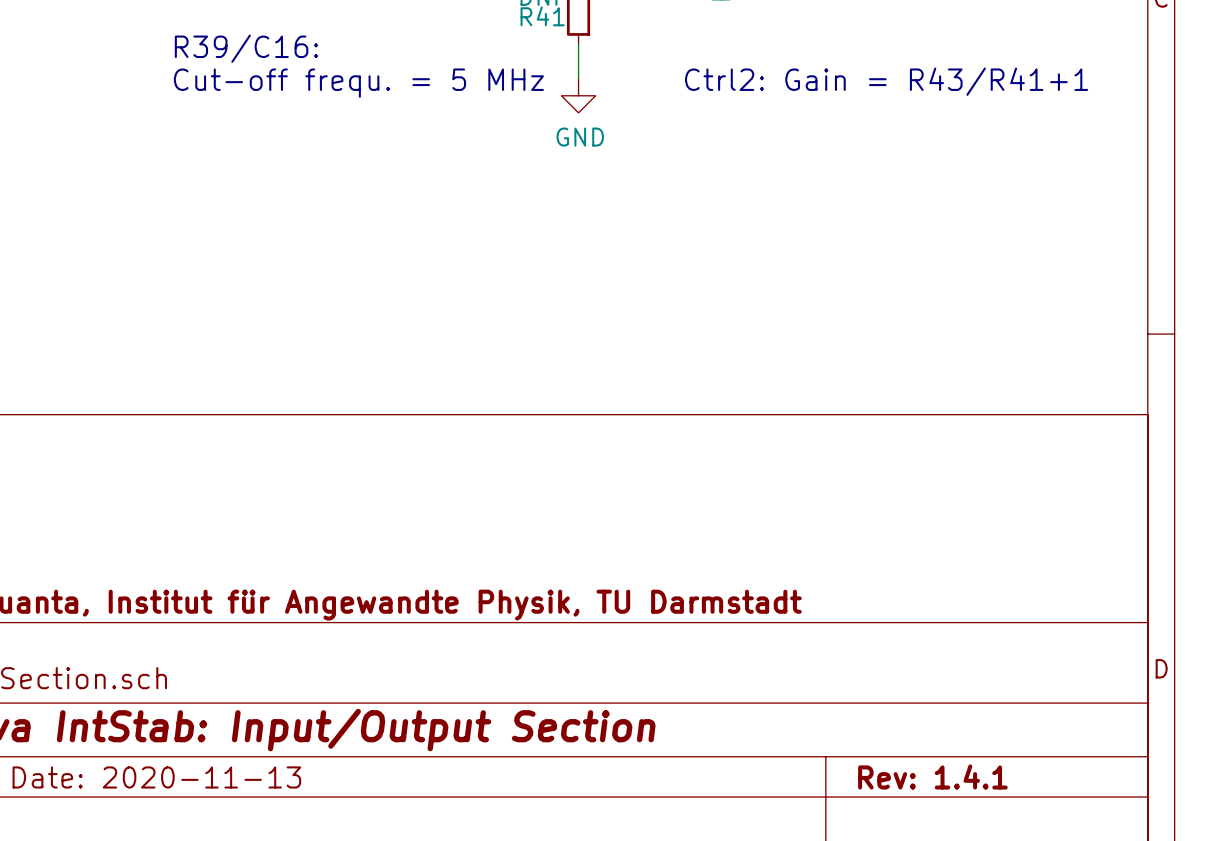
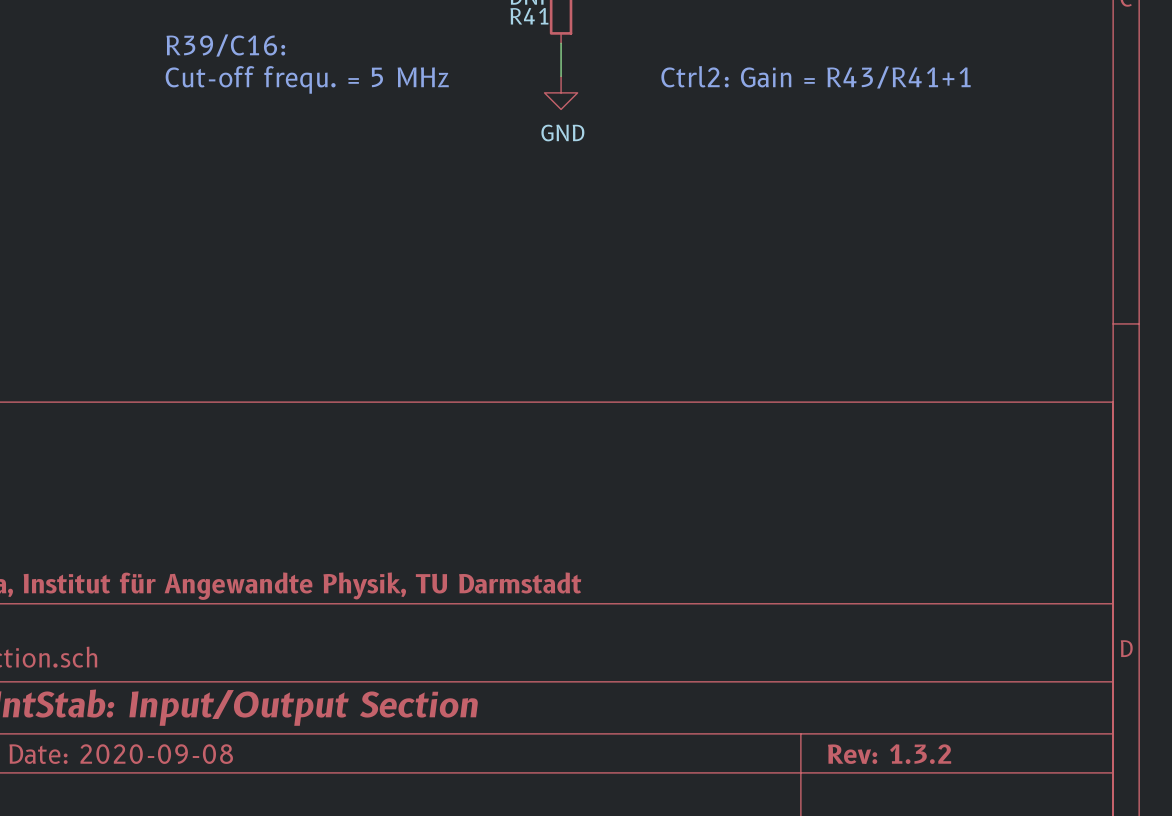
title block: Rev: 1.4.1 (932, 776) -> Rev: 1.3.2 (889, 754)
title block: Date: 2020-11-13 (156, 777) -> Date: 2020-09-08 (121, 754)

